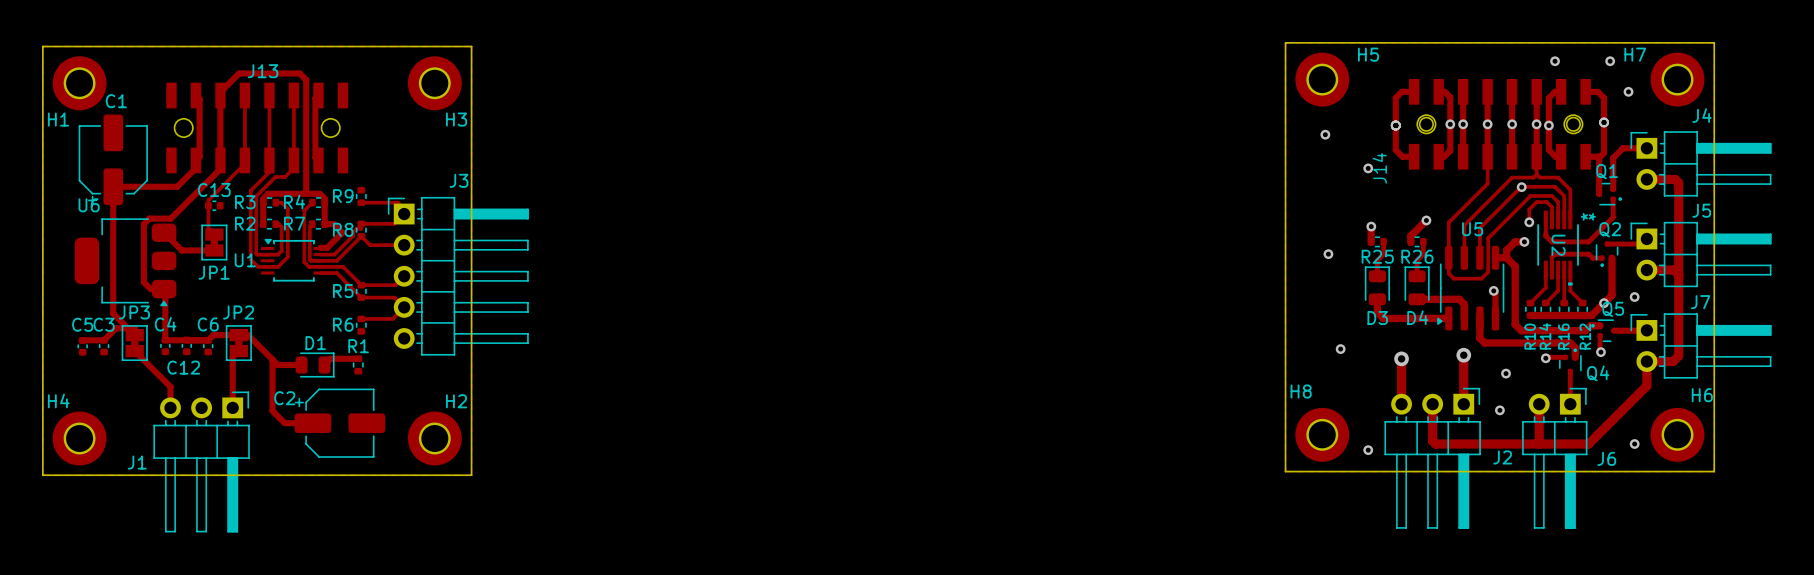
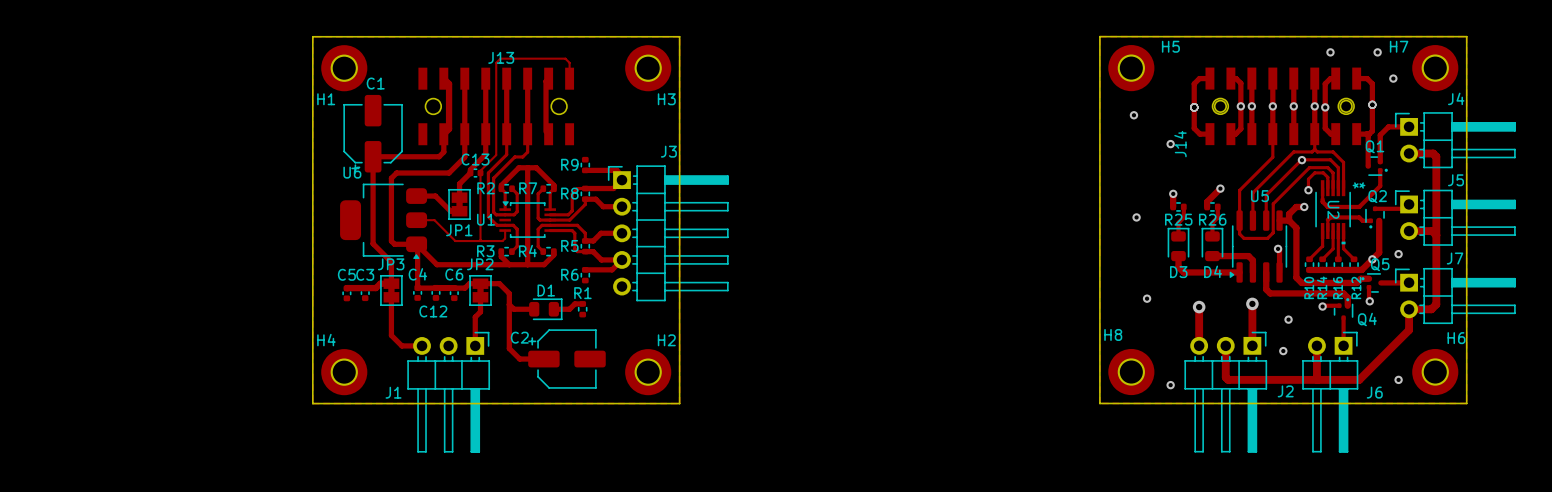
board edge: none -> (312, 36) (679, 36) (679, 403) (312, 403) (312, 36)
board edge: (42, 46) (471, 46) (471, 475) (42, 475) (42, 46) -> none
H1 position: (79, 83) -> (344, 68)
H3 position: (434, 83) -> (648, 68)
track: none -> (443, 78) (449, 83) (449, 128) (443, 134) (443, 152) (439, 156) (373, 156) (373, 243) (391, 262) (391, 283) (380, 283) (375, 288) (346, 288)
track: none -> (464, 78) (464, 157) (449, 173) (396, 173) (391, 178) (391, 241) (394, 244) (416, 244) (437, 264) (544, 264) (553, 254) (553, 251)
track: none -> (485, 78) (485, 154) (459, 183) (459, 197)
track: none -> (506, 78) (506, 154) (488, 173) (488, 216) (497, 225) (513, 225) (517, 229) (517, 246) (511, 251)
track: none -> (527, 78) (527, 152) (522, 156) (514, 156) (493, 178) (493, 212) (496, 214) (514, 214) (517, 211) (517, 193) (512, 188)
track: none -> (548, 78) (546, 81) (546, 131)
track: none -> (569, 78) (569, 62) (565, 58) (500, 58) (496, 62) (496, 155) (480, 170) (481, 241)
track: (195, 95) (199, 99) (199, 156) (195, 160) (195, 168) (177, 186) (113, 186) (113, 313) (134, 335) (134, 328) (116, 328) (104, 340) (82, 340) -> none
track: (244, 95) (244, 163) (208, 200) (208, 228) (214, 234) -> none
track: (269, 95) (269, 172) (250, 190) (250, 259) (258, 266) (278, 266) (287, 257) (287, 208) (281, 202) (275, 202) -> none
track: (293, 95) (293, 168) (285, 176) (275, 176) (256, 196) (257, 254) (278, 254) (281, 250) (281, 227) (275, 224) -> none
track: (318, 95) (315, 98) (315, 157) (318, 160) -> none
J13 position: (257, 127) -> (496, 106)
C1 position: (113, 159) -> (373, 133)
track: (306, 193) (306, 79) (299, 73) (239, 73) (220, 92) (220, 169) (170, 218) (149, 218) (143, 224) (143, 282) (150, 289) (165, 290) (165, 340) (208, 340) (213, 335) (248, 335) (277, 365) (301, 365) -> none
R9 position: (361, 196) -> (585, 165)
track: none -> (527, 167) (527, 264)
track: none -> (585, 170) (616, 170) (621, 175) (621, 180) (613, 188) (577, 188) (572, 193) (572, 210) (568, 214) (550, 214)
track: (263, 202) (263, 224) -> none
R3 position: (269, 202) -> (506, 251)
track: (312, 202) (304, 210) (304, 262) (309, 266) (343, 266) (361, 285) (395, 285) (404, 276) -> none
R4 position: (318, 202) -> (548, 251)
track: (324, 202) (324, 198) (319, 193) (268, 193) (263, 198) (263, 202) -> none
track: (324, 202) (324, 224) (333, 224) (342, 232) (327, 247) (320, 247) -> none
track: (361, 202) (398, 202) (404, 208) (404, 214) (394, 223) (361, 223) (361, 228) (356, 228) (353, 232) (353, 235) (334, 254) (320, 254) -> none
C13 position: (214, 205) -> (475, 173)
track: none -> (543, 188) (538, 193) (538, 218) (540, 220) (569, 220) (585, 204) (585, 199) (595, 199) (603, 206) (621, 206)
R2 position: (269, 224) -> (506, 188)
track: (312, 224) (309, 226) (310, 260) (336, 260) (361, 236) (370, 245) (404, 245) -> none
R7 position: (318, 224) -> (548, 188)
track: none -> (416, 196) (435, 196) (450, 211) (459, 211)
R8 position: (361, 230) -> (585, 193)
track: (164, 232) (181, 250) (214, 250) -> none
JP1 position: (214, 242) -> (459, 204)
track: none -> (505, 209) (505, 192) (501, 188) (501, 185) (518, 167) (536, 167) (553, 185) (553, 188) (550, 192) (550, 209)
track: none -> (416, 220) (434, 220) (455, 241) (502, 241) (505, 238) (505, 230)
U1 position: (293, 260) -> (527, 219)
U6 position: (125, 262) -> (383, 221)
track: none -> (550, 230) (572, 230) (574, 233) (574, 248) (577, 251) (593, 251) (601, 259) (621, 259) (612, 269) (585, 269)
track: none -> (621, 233) (601, 233) (593, 240) (585, 240) (585, 233) (577, 225) (542, 225) (538, 229) (538, 246) (543, 251)
track: (320, 273) (336, 273) (361, 297) (394, 297) (404, 307) (392, 318) (361, 318) -> none
J3 position: (458, 276) -> (668, 233)
track: none -> (417, 245) (417, 288) (465, 288) (469, 283) (499, 283) (509, 293) (509, 348) (519, 359) (543, 359)
R5 position: (361, 291) -> (585, 246)
track: none -> (501, 251) (501, 256) (509, 264)
R6 position: (361, 325) -> (585, 275)
JP3 position: (134, 343) -> (391, 290)
JP2 position: (238, 343) -> (480, 290)
C4 position: (165, 345) -> (417, 292)
C12 position: (186, 345) -> (435, 292)
C5 position: (82, 346) -> (346, 293)
C3 position: (104, 346) -> (365, 293)
C6 position: (208, 346) -> (454, 293)
track: none -> (391, 297) (391, 335) (401, 345) (422, 345)
track: none -> (480, 297) (480, 311) (475, 317) (475, 345)
track: (134, 351) (170, 386) (170, 407) -> none
track: (238, 351) (232, 357) (232, 407) -> none
track: none -> (582, 303) (574, 303) (569, 309) (553, 309)
track: none -> (509, 304) (513, 309) (534, 309)
track: (358, 358) (330, 358) (324, 365) -> none
track: (272, 359) (272, 410) (284, 423) (312, 423) -> none
D1 position: (315, 365) -> (545, 309)
R1 position: (358, 365) -> (582, 309)
C2 position: (339, 423) -> (566, 359)
H4 position: (79, 438) -> (344, 372)
H2 position: (434, 438) -> (648, 372)
J1 position: (201, 461) -> (448, 392)

